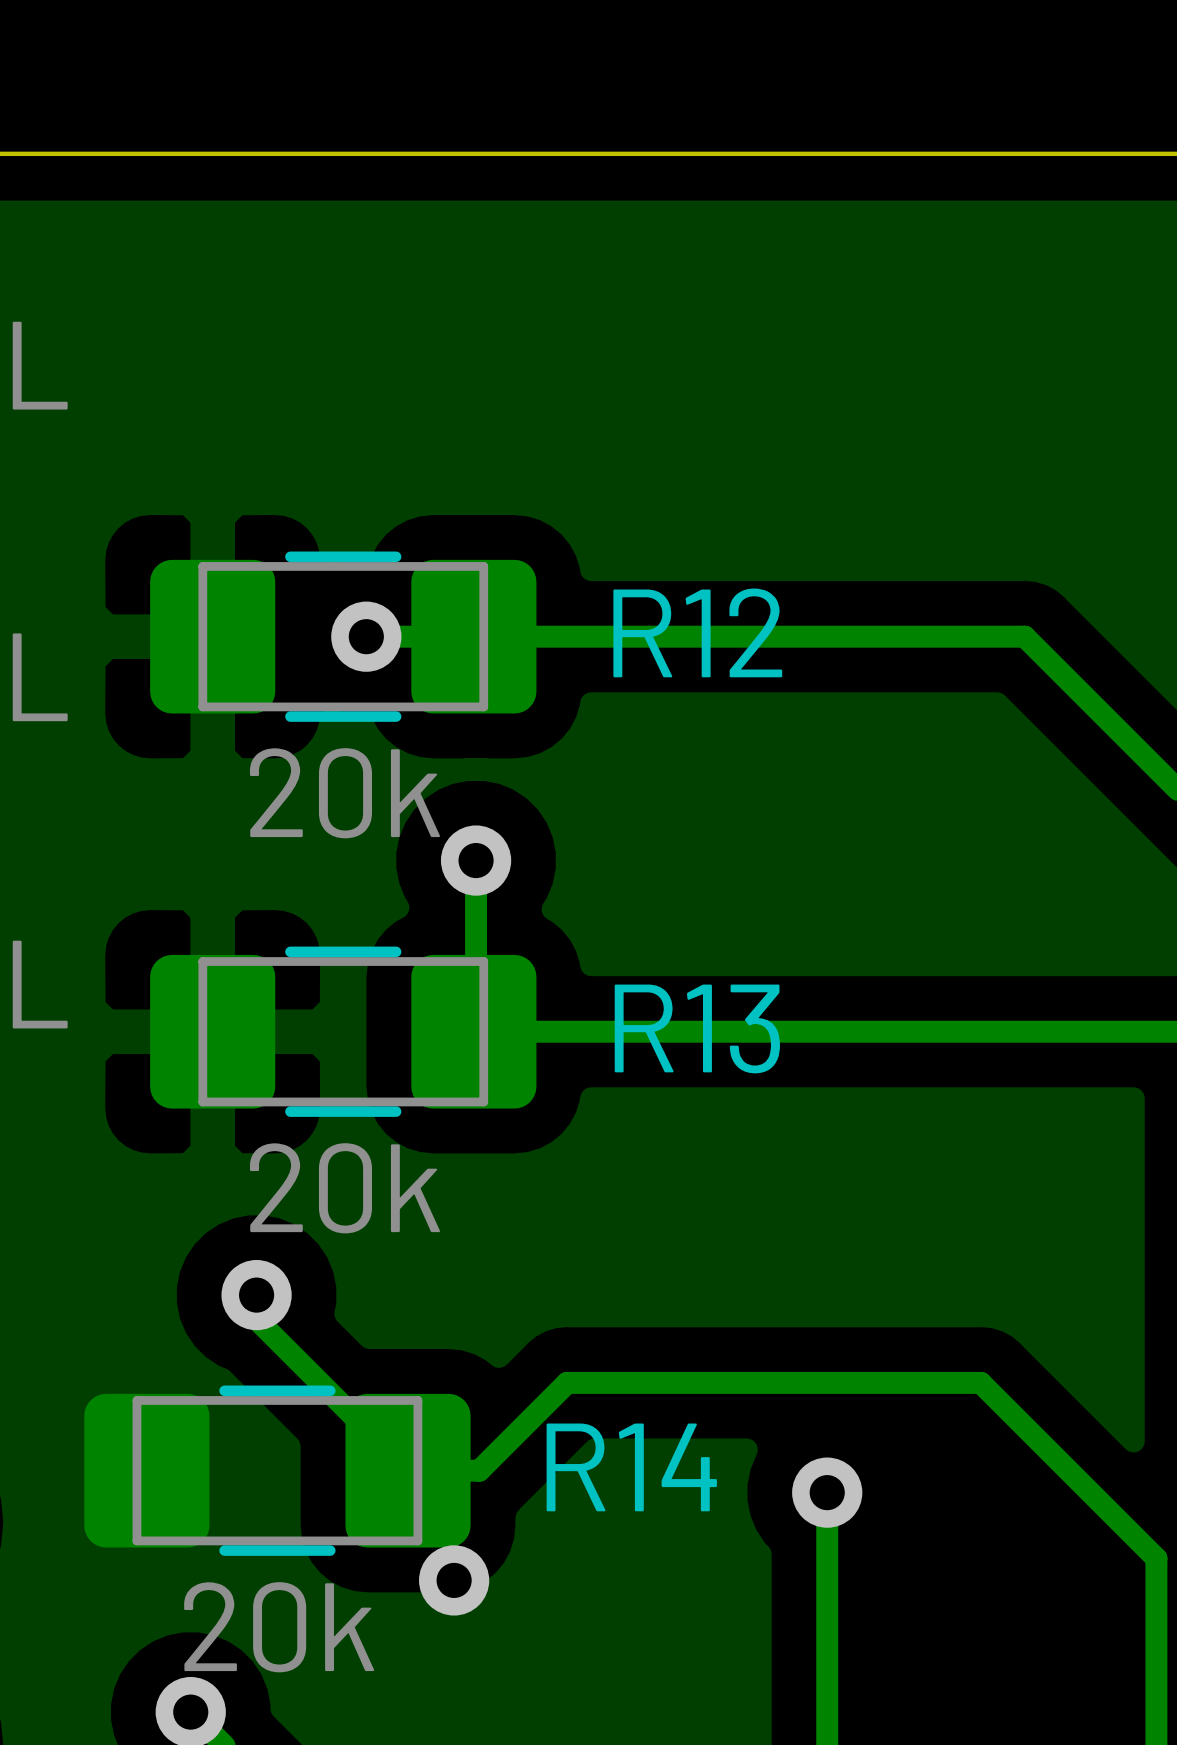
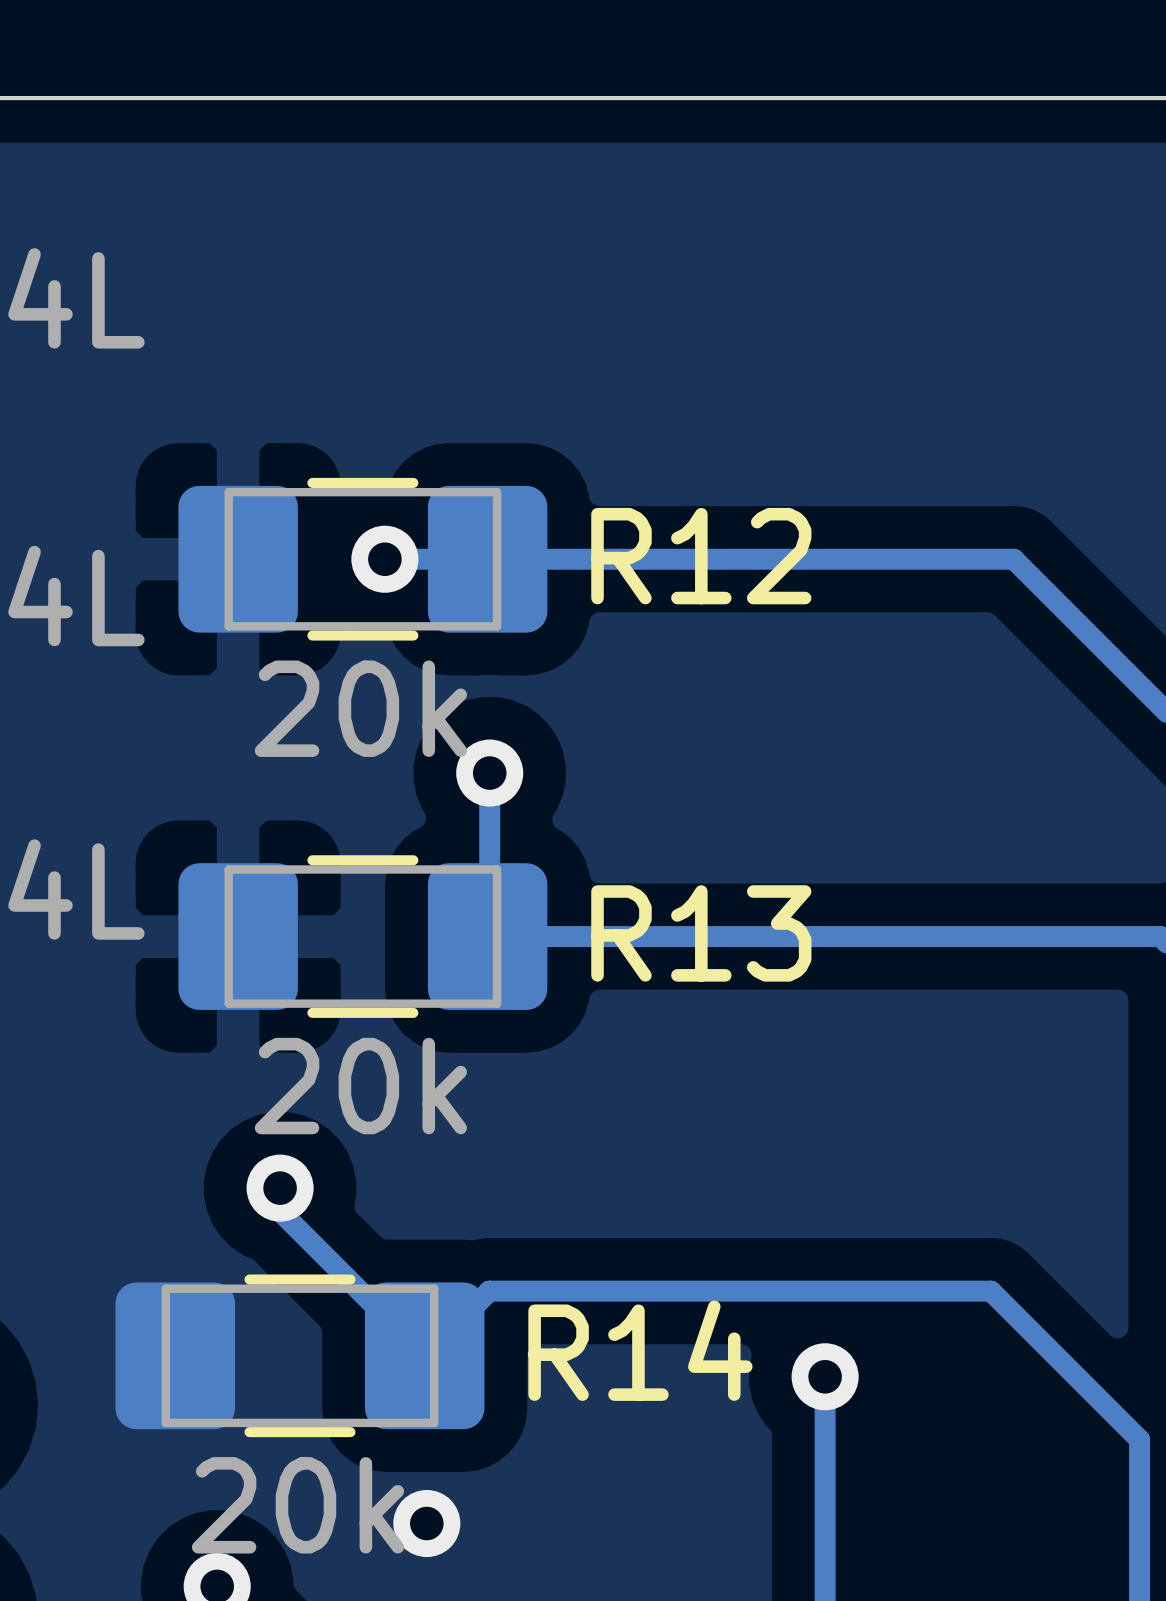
track: (1000, 1402) (980, 1382) (567, 1382) (479, 1470) (408, 1470) -> (991, 1291) (489, 1291) (424, 1355)
via position: (454, 1580) -> (426, 1523)

